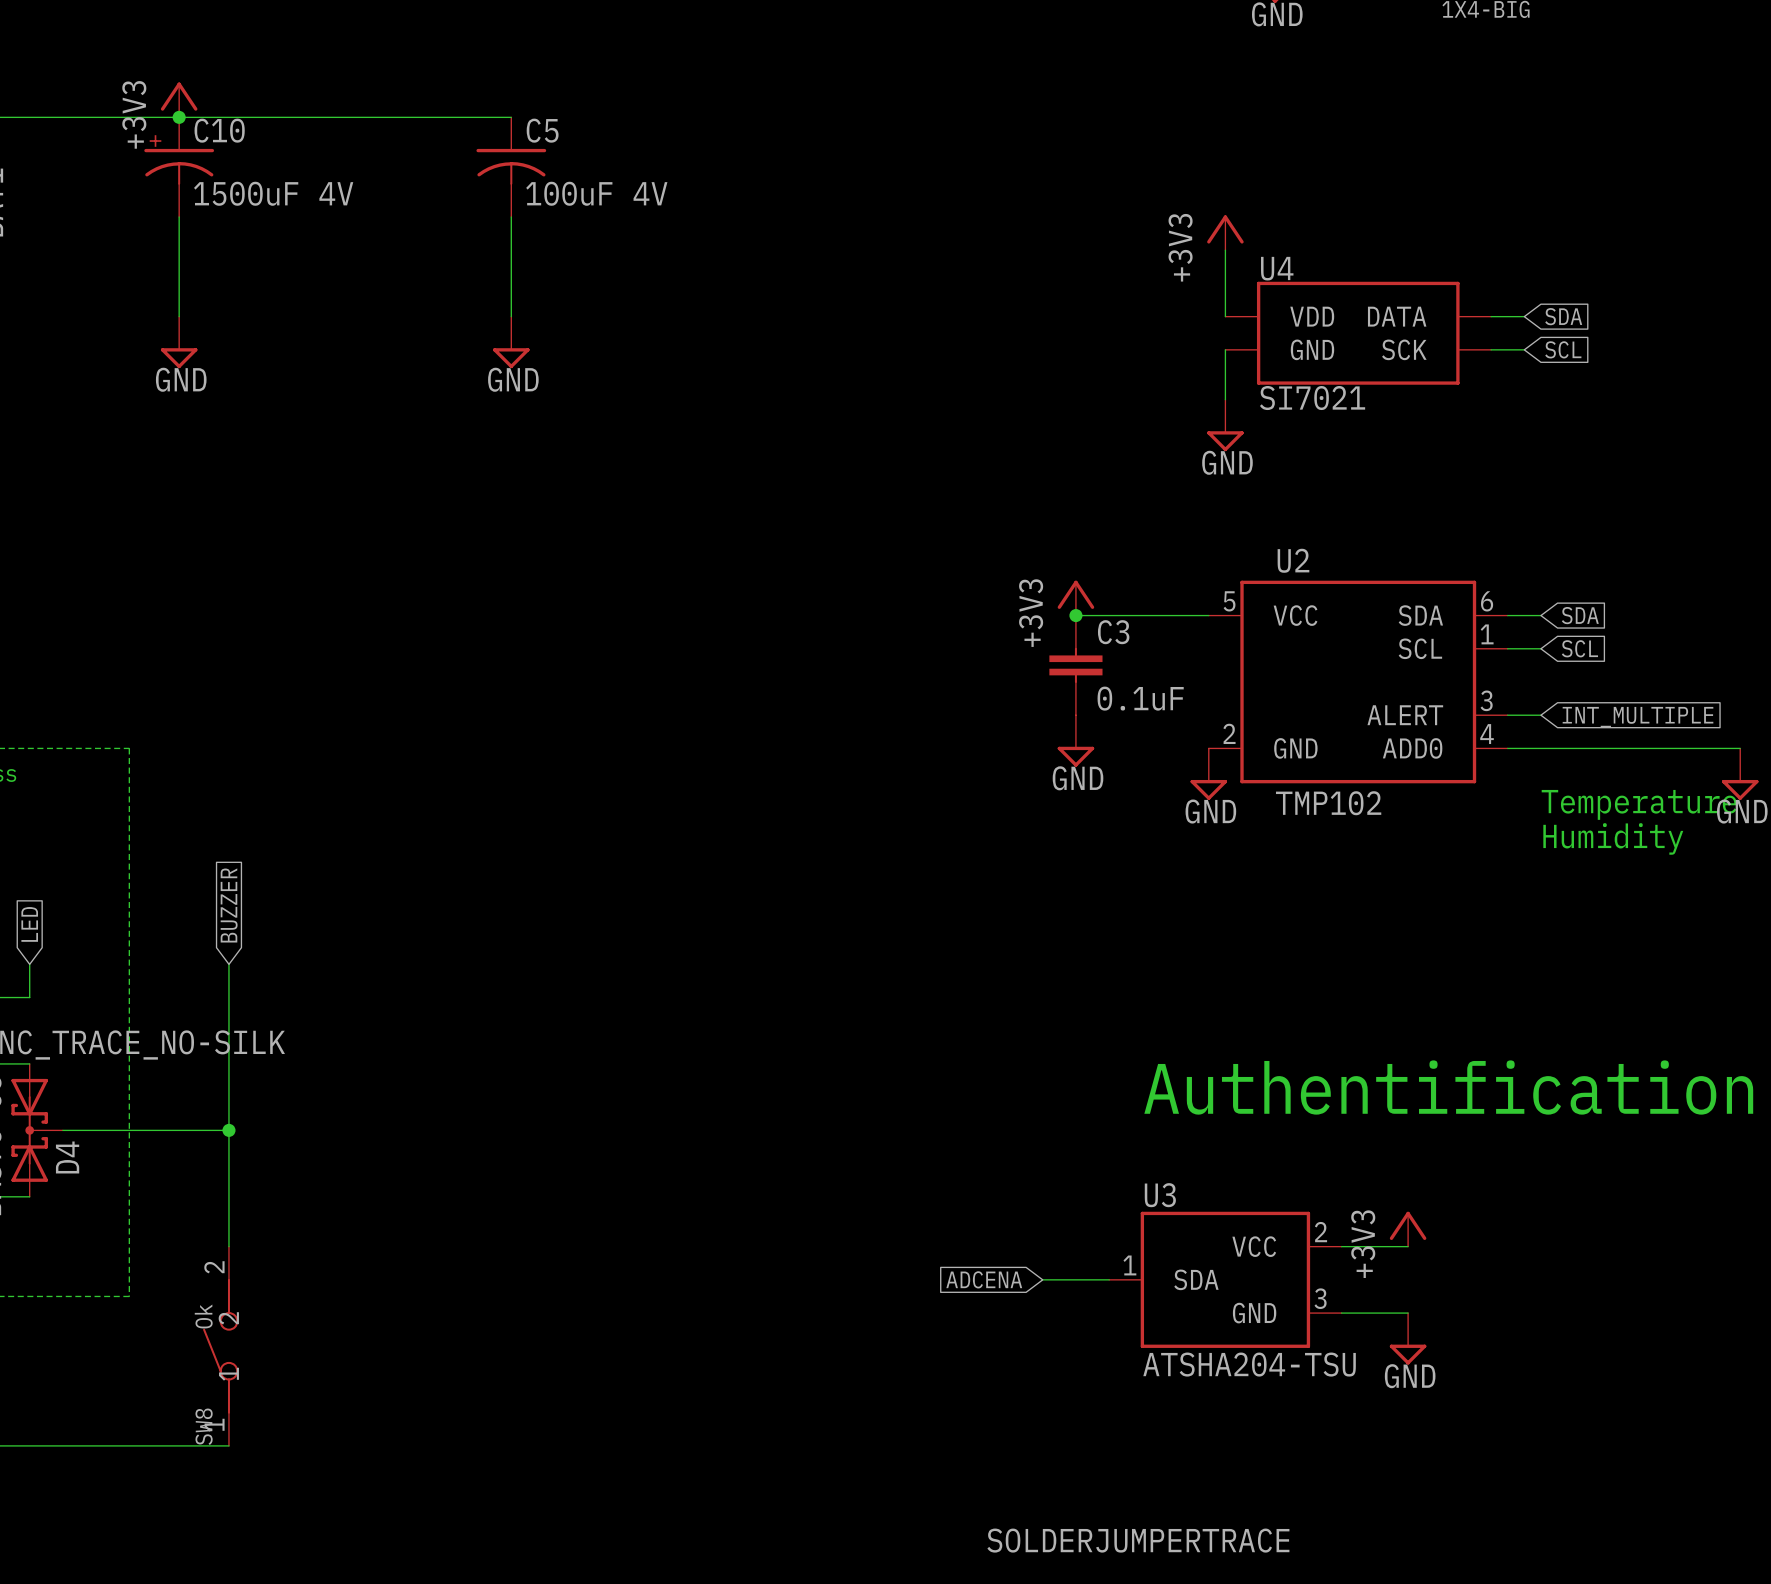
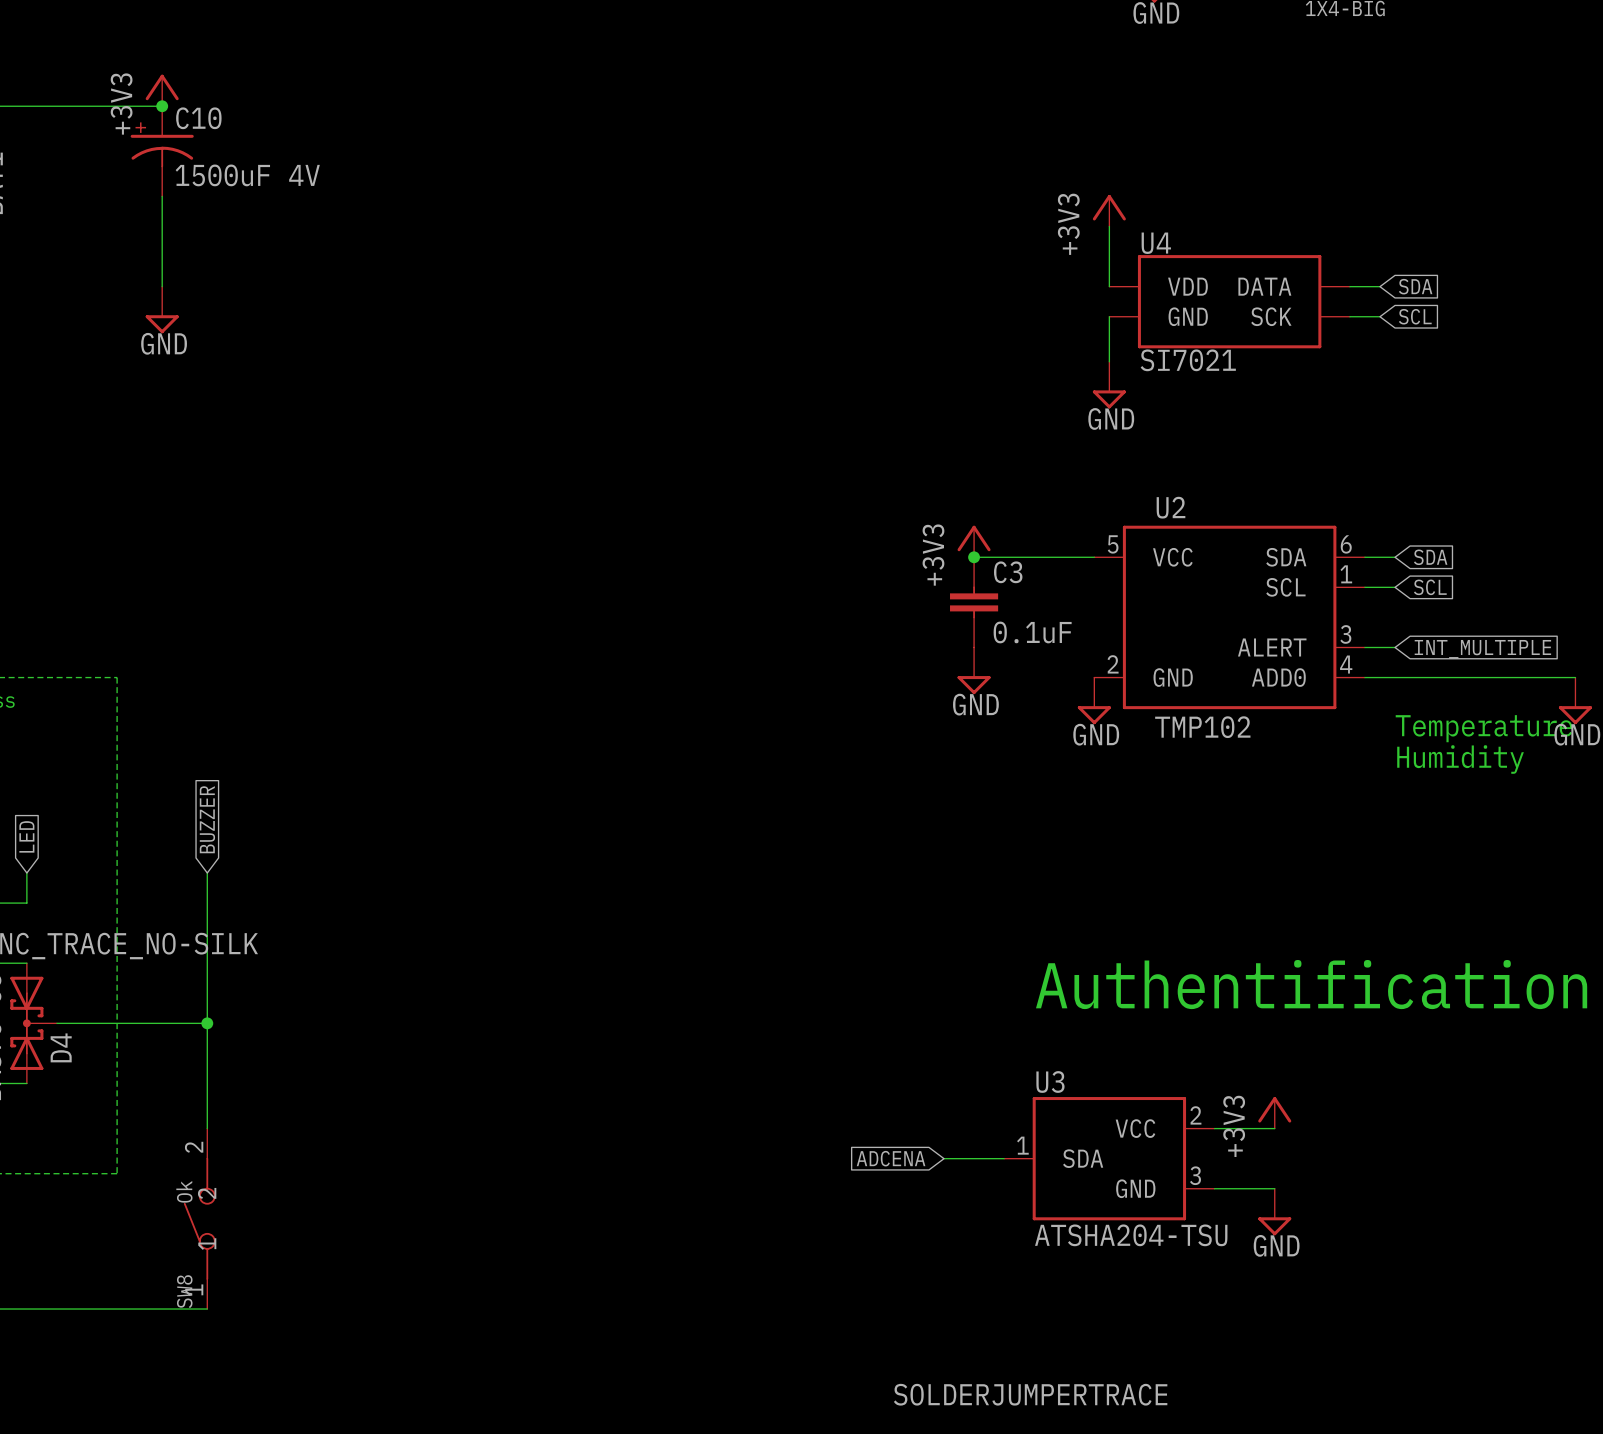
wire: (179, 117) (511, 117) -> none
C5: 100uF 4V (511, 167) -> none
wire: (511, 217) (511, 316) -> none
power symbol: GND (511, 342) -> none

